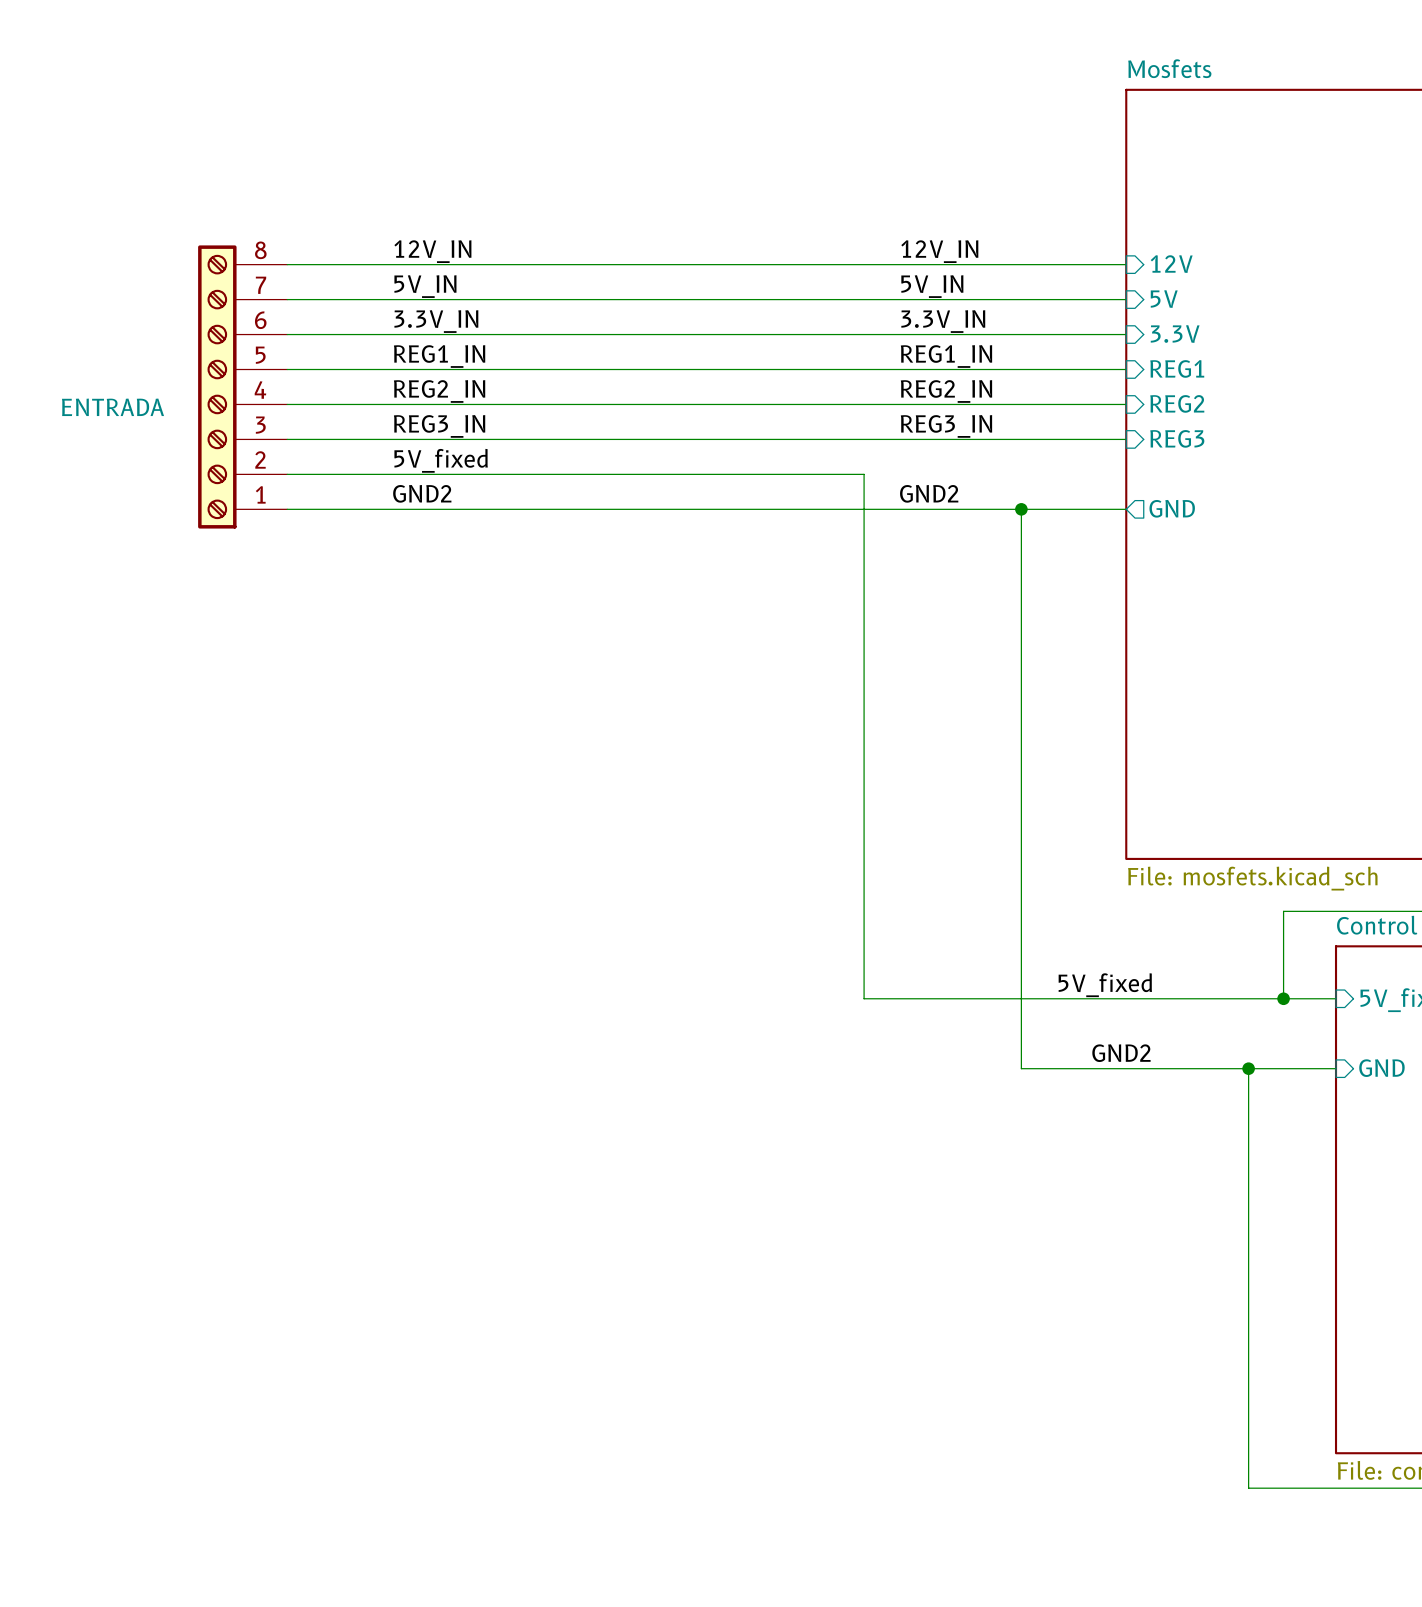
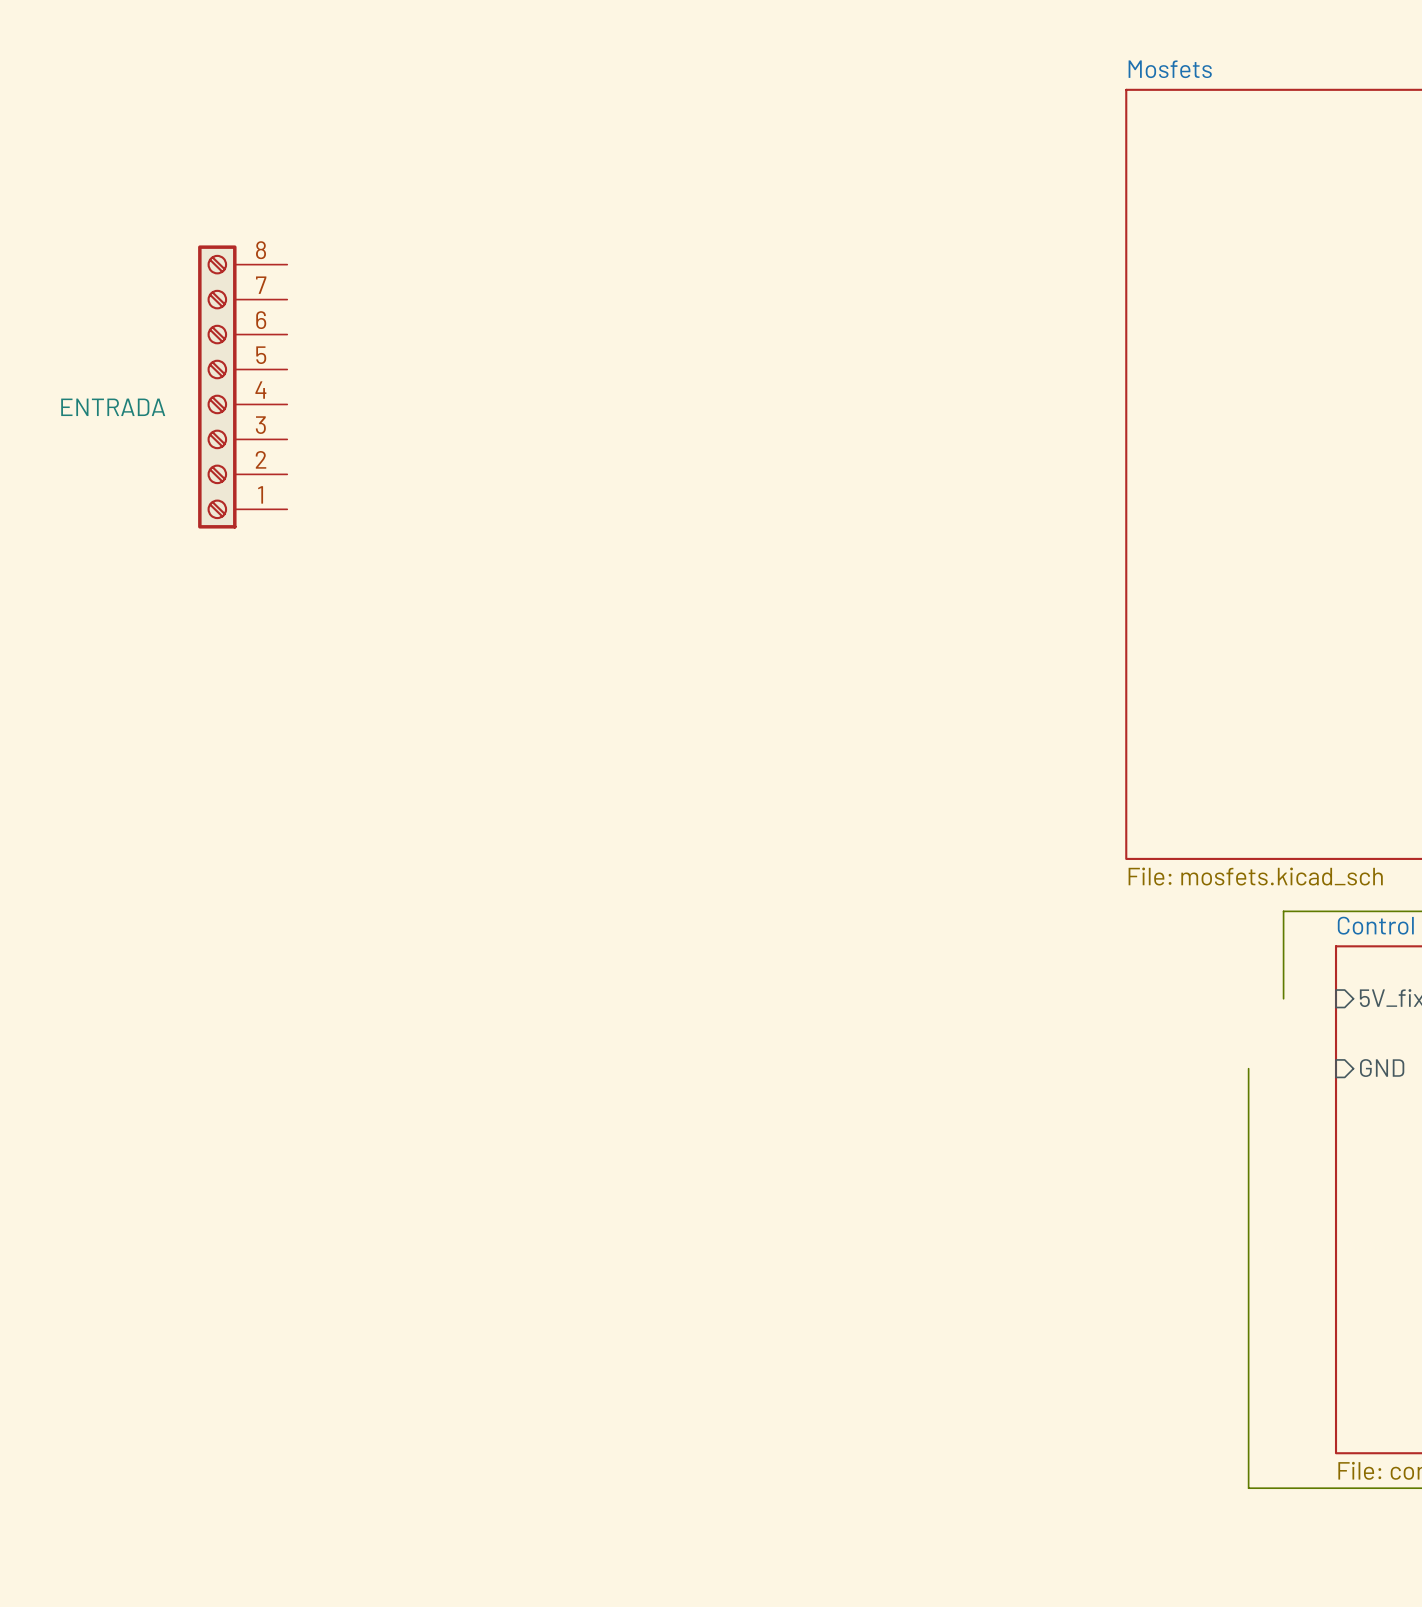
label: 12V_IN (432, 251) -> none
label: 12V_IN (939, 251) -> none
wire: (287, 264) (1126, 264) -> none
sheet pin: 12V (1171, 264) -> none
label: 5V_IN (425, 286) -> none
label: 5V_IN (932, 286) -> none
wire: (287, 299) (1126, 299) -> none
sheet pin: 5V (1164, 299) -> none
label: 3.3V_IN (436, 321) -> none
label: 3.3V_IN (943, 321) -> none
wire: (287, 334) (1126, 334) -> none
sheet pin: 3.3V (1175, 334) -> none
label: REG1_IN (439, 356) -> none
label: REG1_IN (946, 356) -> none
sheet pin: REG1 (1177, 368) -> none
wire: (287, 369) (1126, 369) -> none
label: REG2_IN (439, 391) -> none
label: REG2_IN (946, 391) -> none
sheet pin: REG2 (1177, 403) -> none
wire: (287, 404) (1126, 404) -> none
label: REG3_IN (439, 426) -> none
label: REG3_IN (946, 426) -> none
sheet pin: REG3 (1177, 438) -> none
wire: (287, 439) (1126, 439) -> none
label: 5V_fixed (441, 460) -> none
wire: (287, 474) (864, 474) (864, 998) (1336, 998) -> none
label: GND2 (422, 493) -> none
label: GND2 (929, 493) -> none
sheet pin: GND (1172, 508) -> none
wire: (287, 509) (1126, 509) -> none
wire: (1021, 509) (1021, 1068) (1336, 1068) -> none
junction: (1021, 509) -> none
label: 5V_fixed (1105, 985) -> none
junction: (1283, 998) -> none
label: GND2 (1121, 1053) -> none
junction: (1248, 1068) -> none

